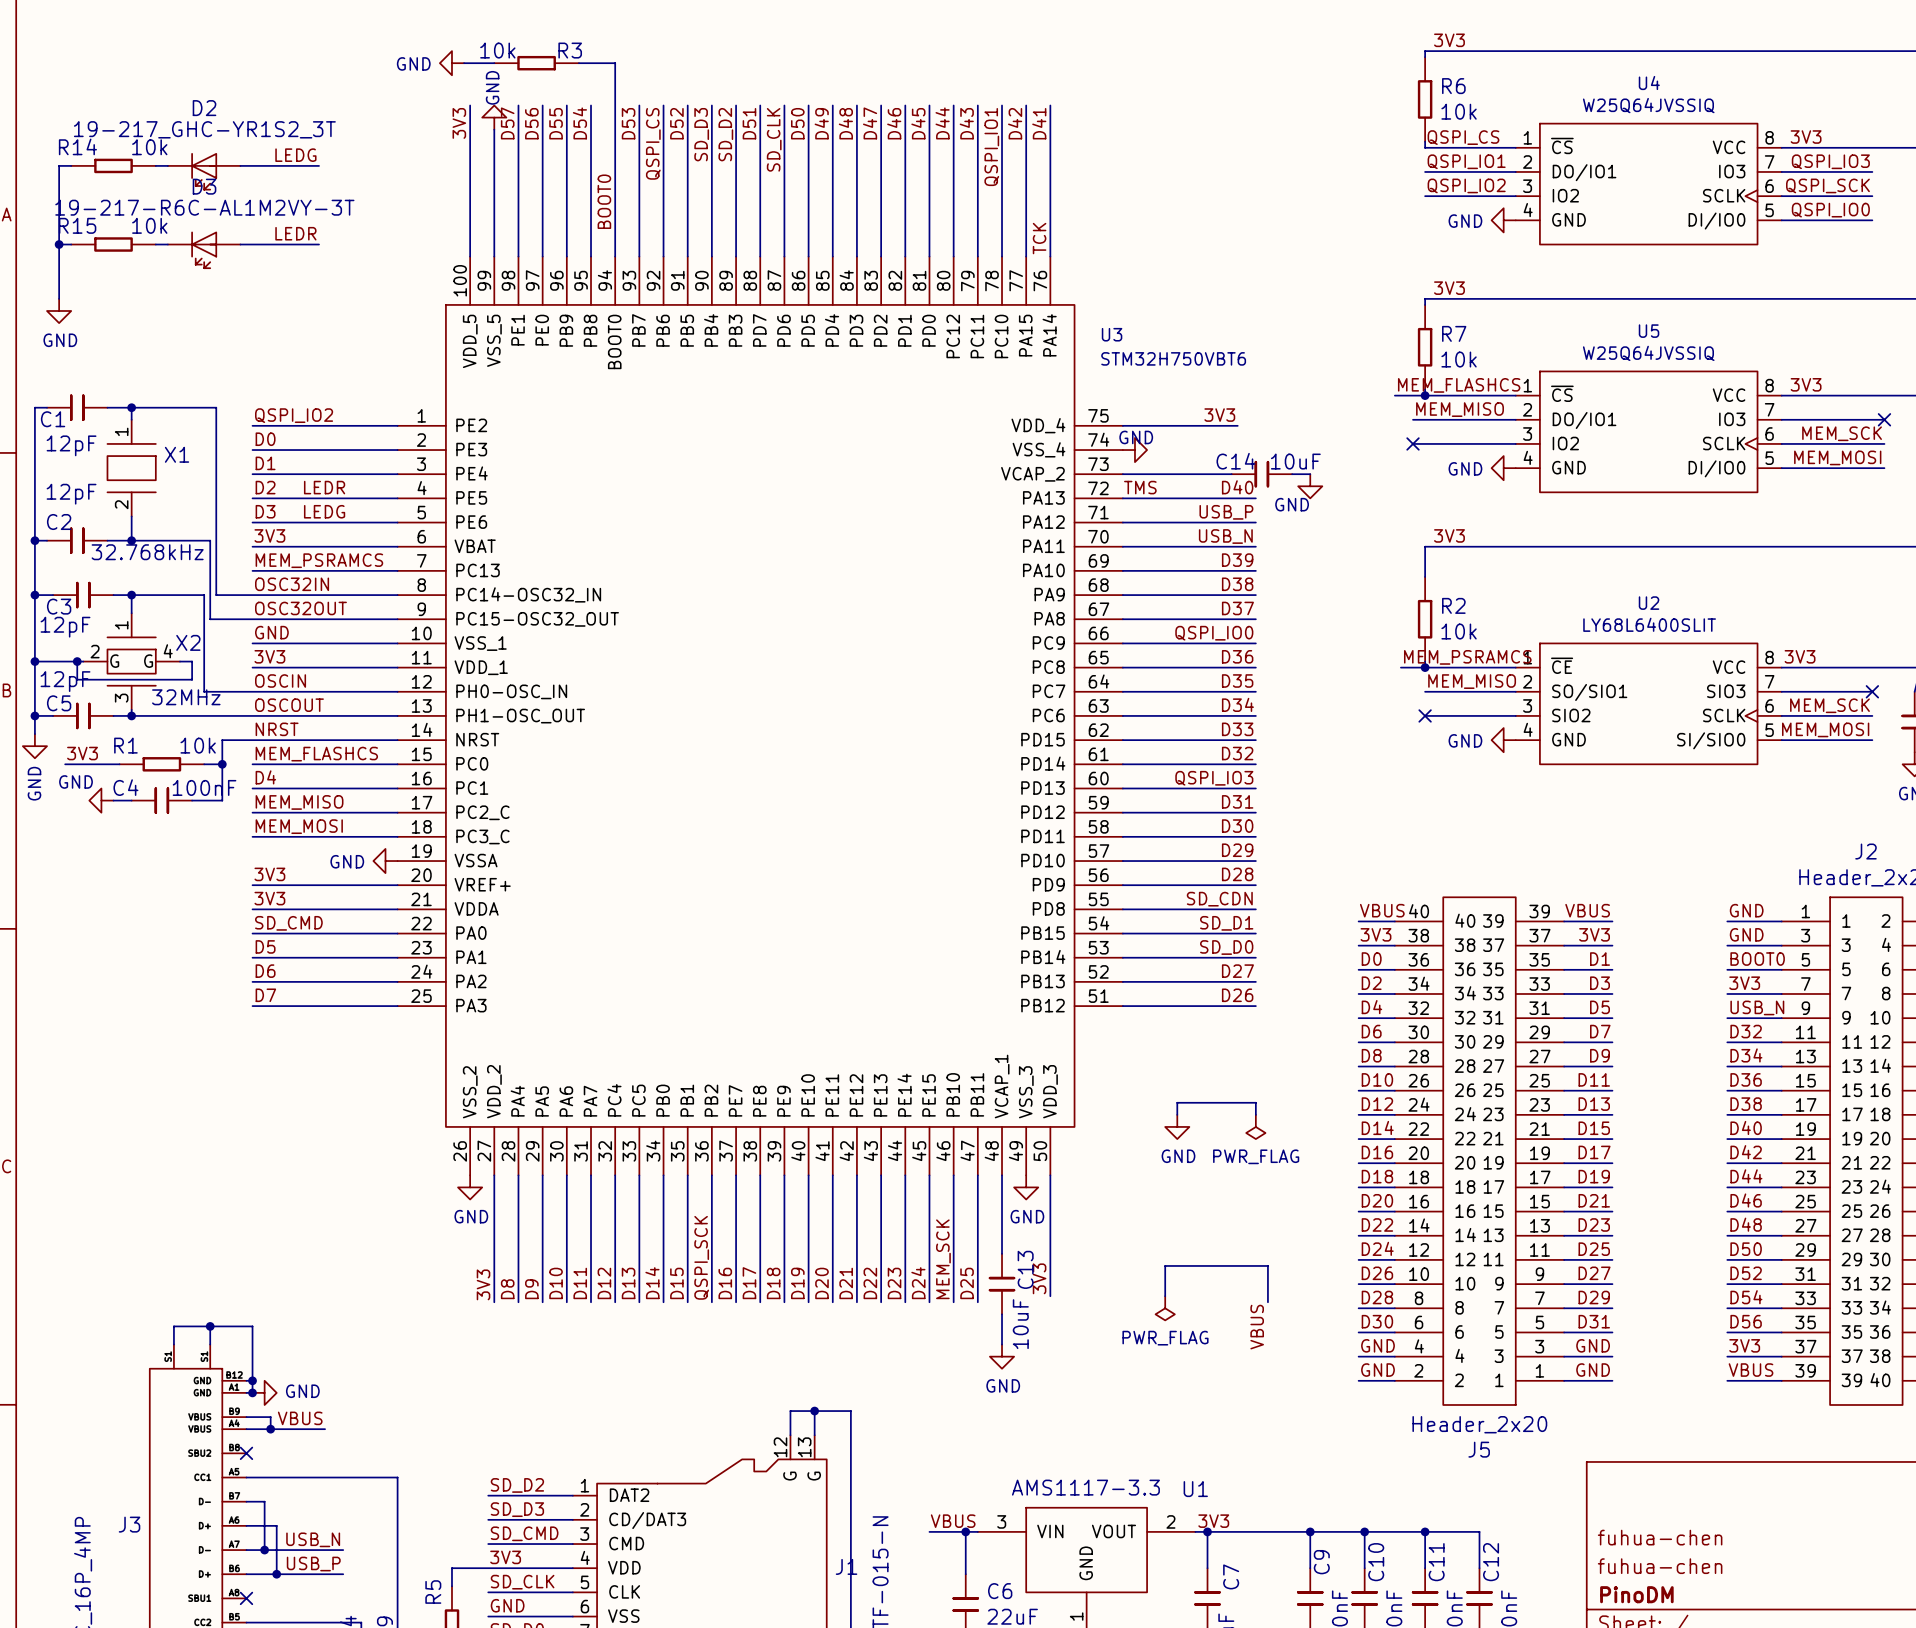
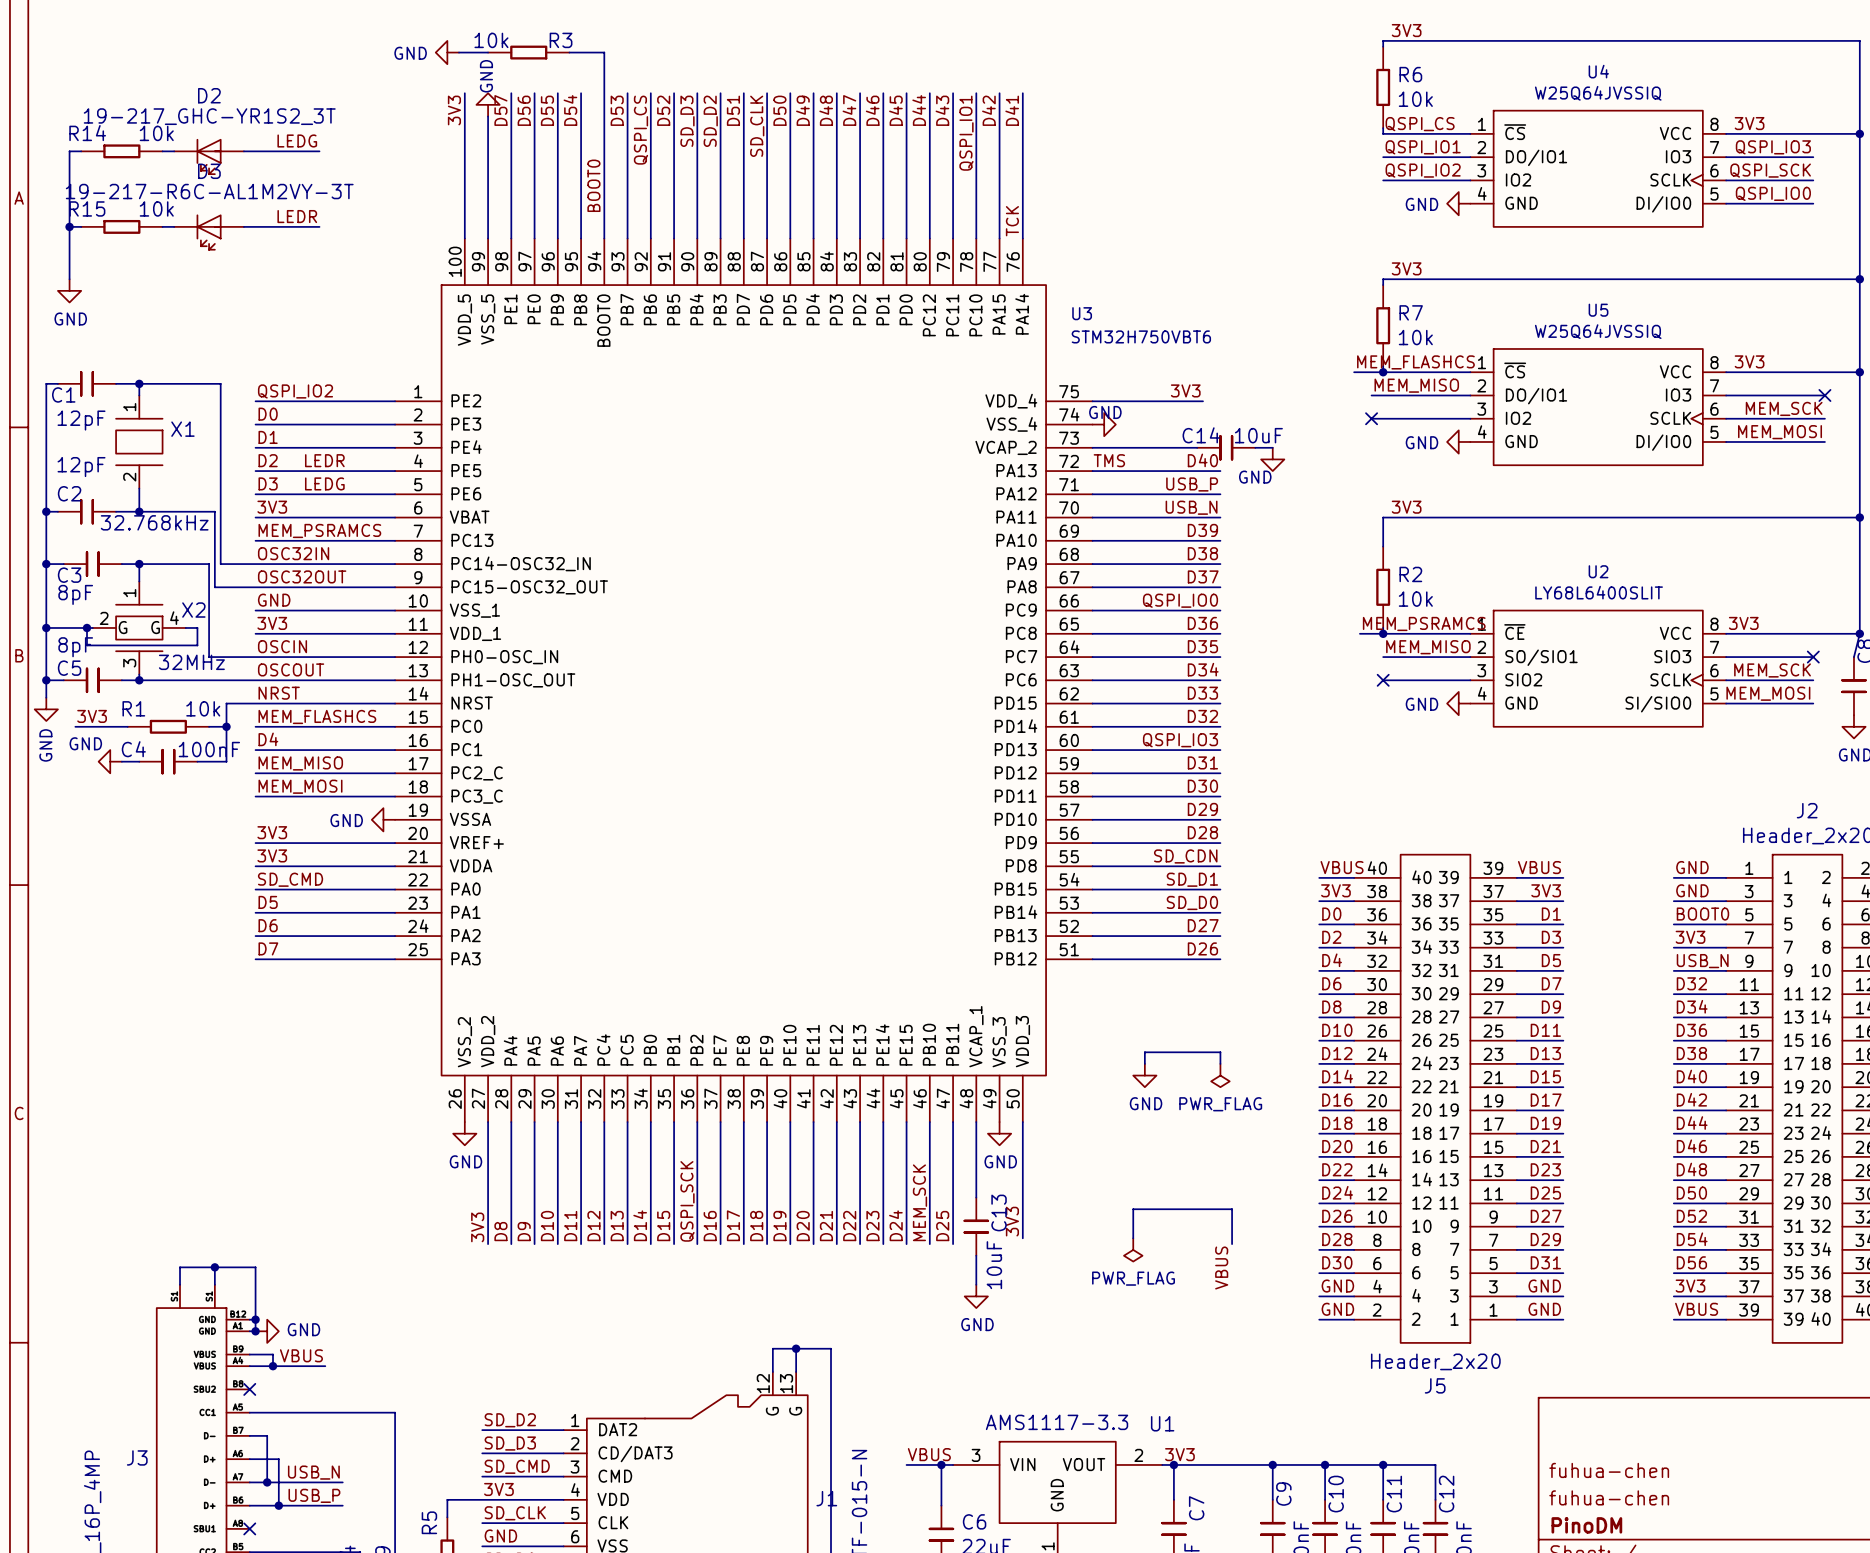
C3 value: 12pF (65, 627) -> 8pF (75, 594)
C5 value: 12pF (65, 681) -> 8pF (75, 647)

